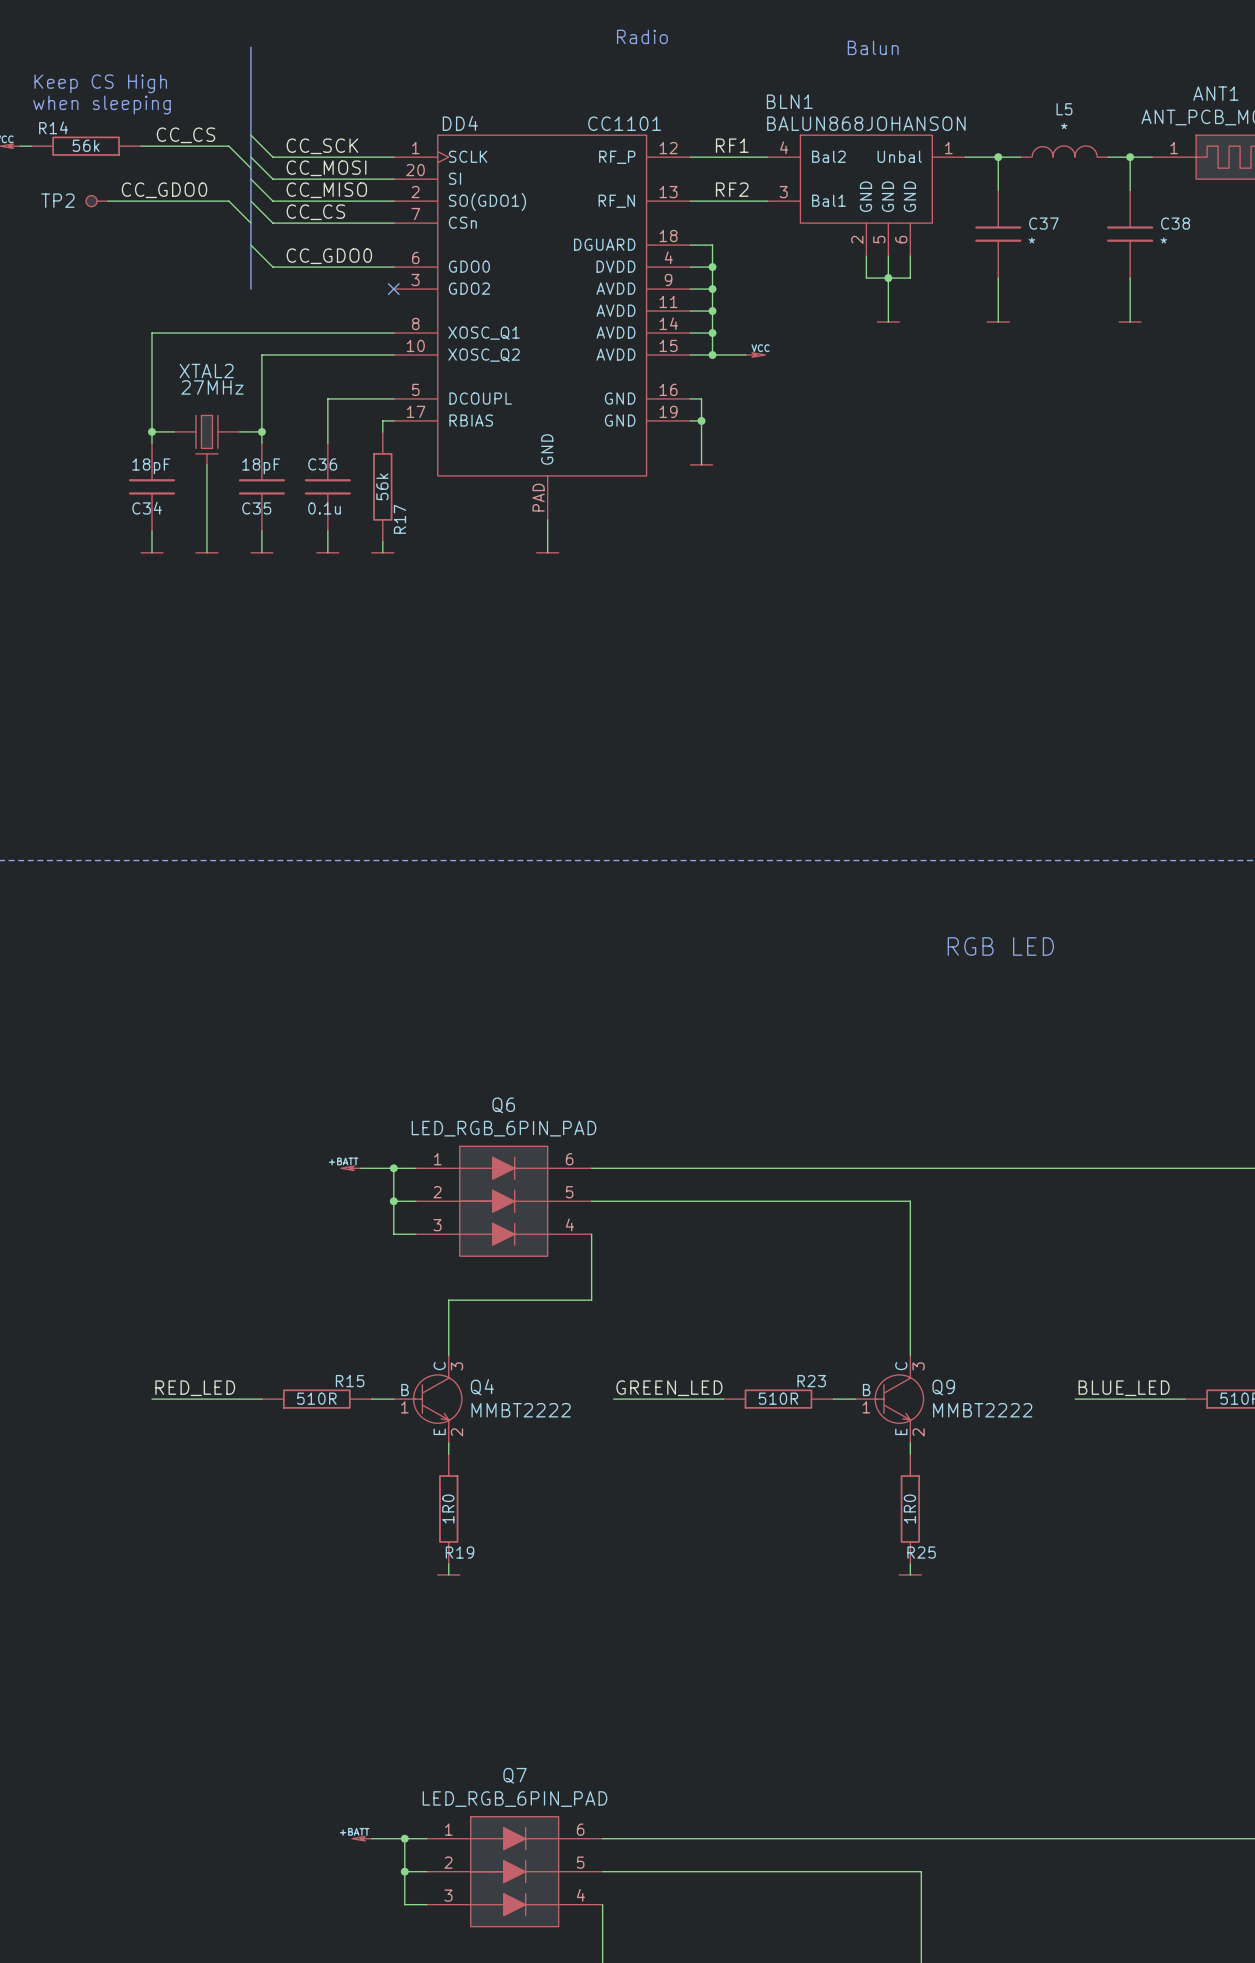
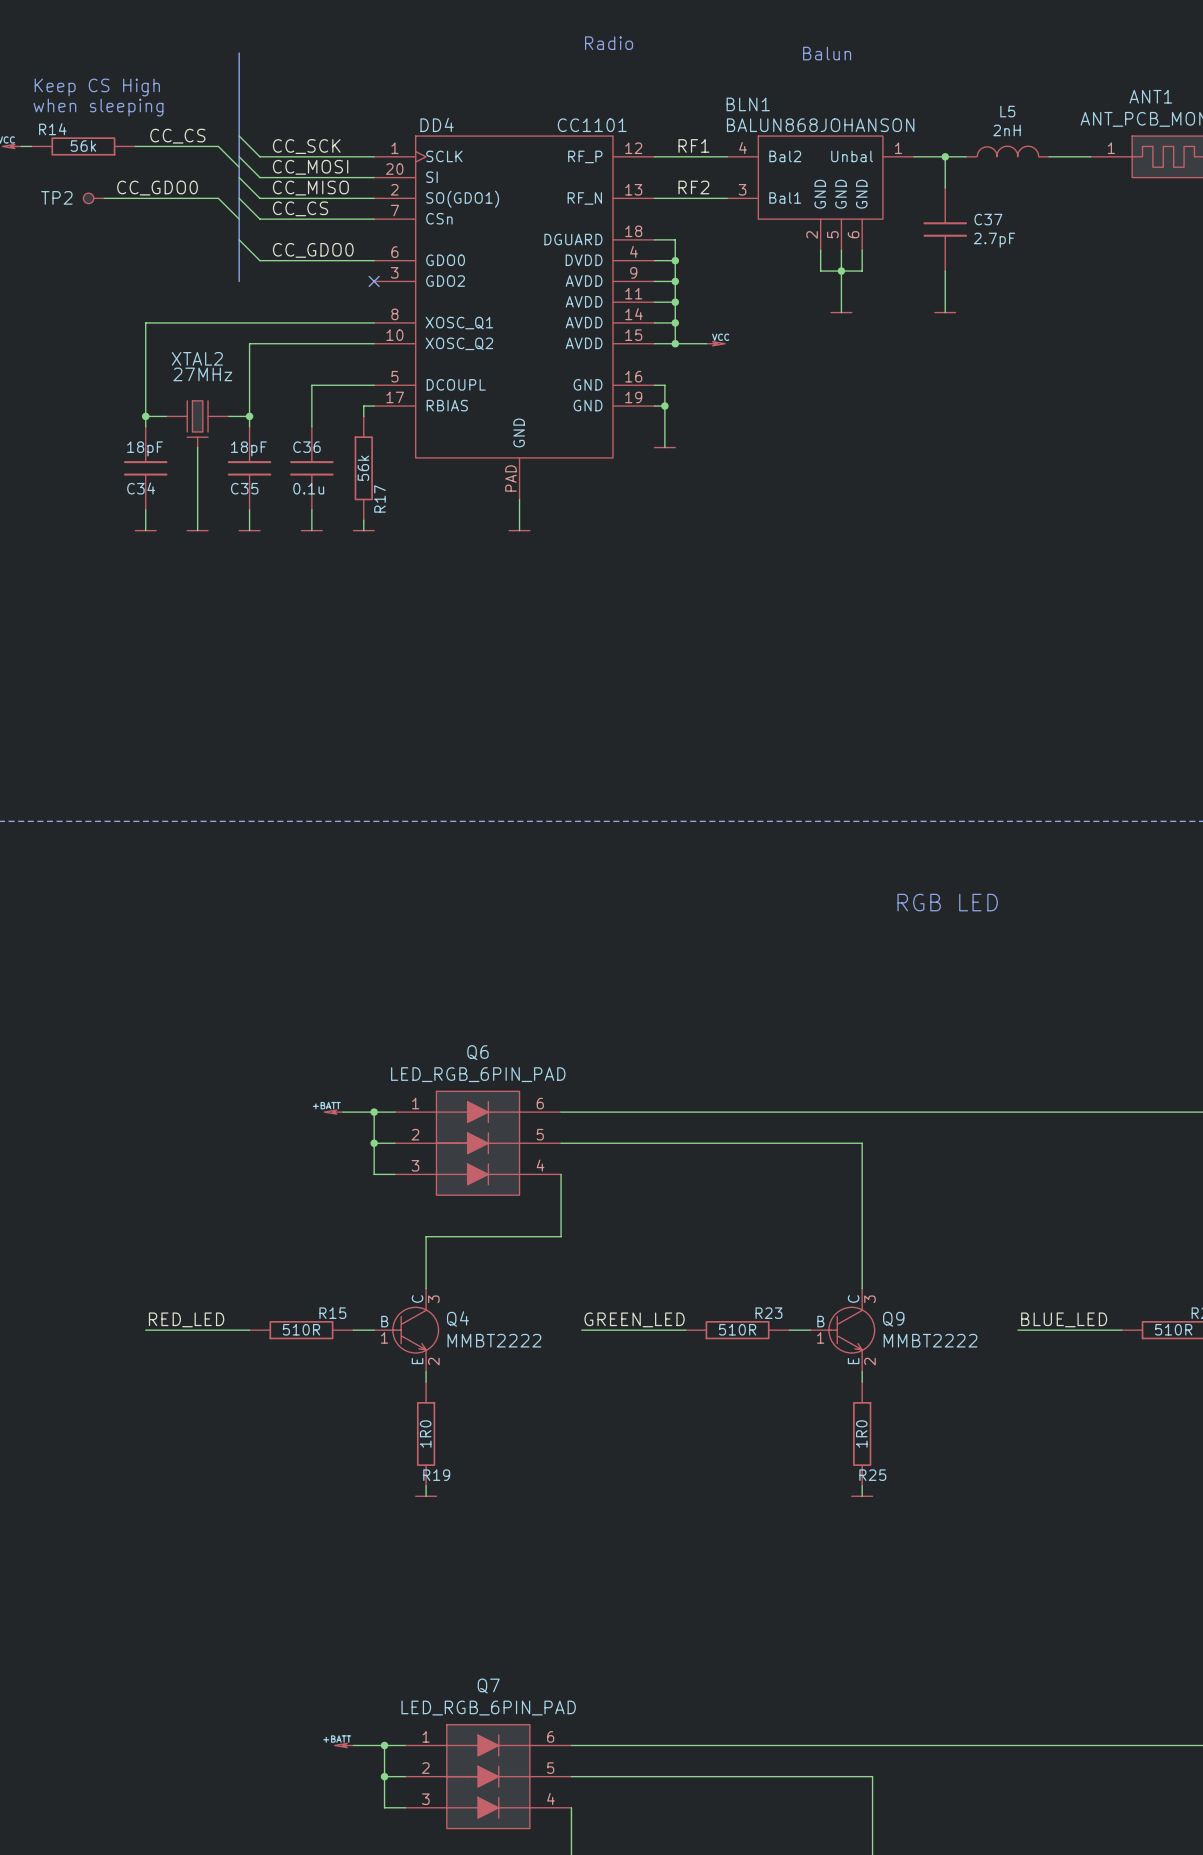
L5 value: * (1064, 126) -> 2nH (1007, 130)
wire: (1130, 157) (1130, 190) -> none
junction: (1130, 157) -> none
C38: * (1130, 234) -> none
C37 value: * (1031, 240) -> 2.7pF (994, 240)
wire: (1130, 278) (1130, 322) -> none
power symbol: (1130, 322) -> none

